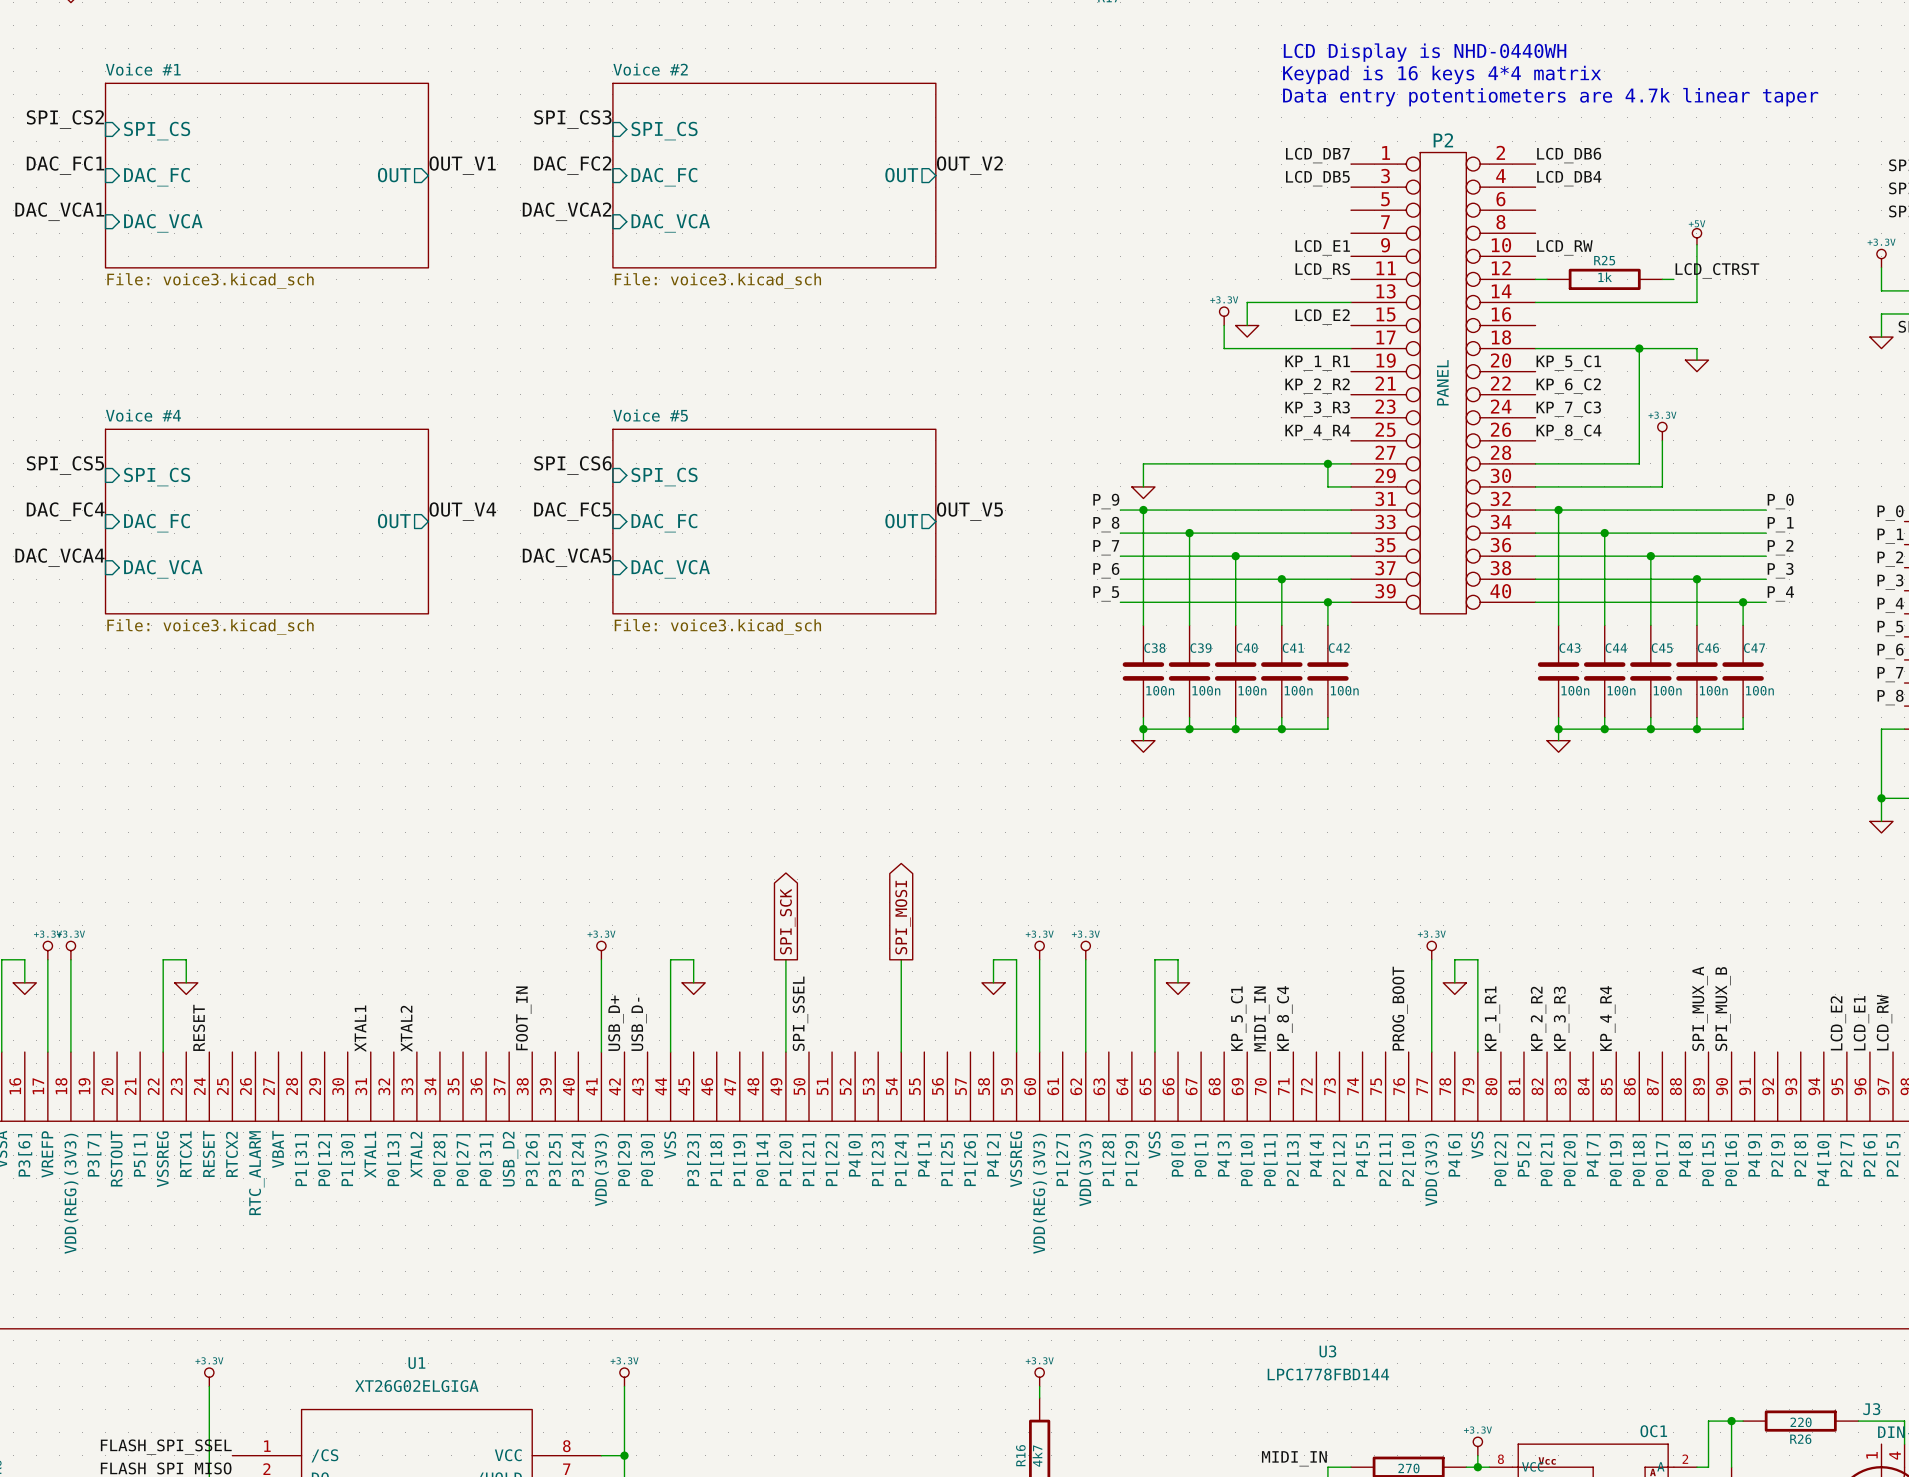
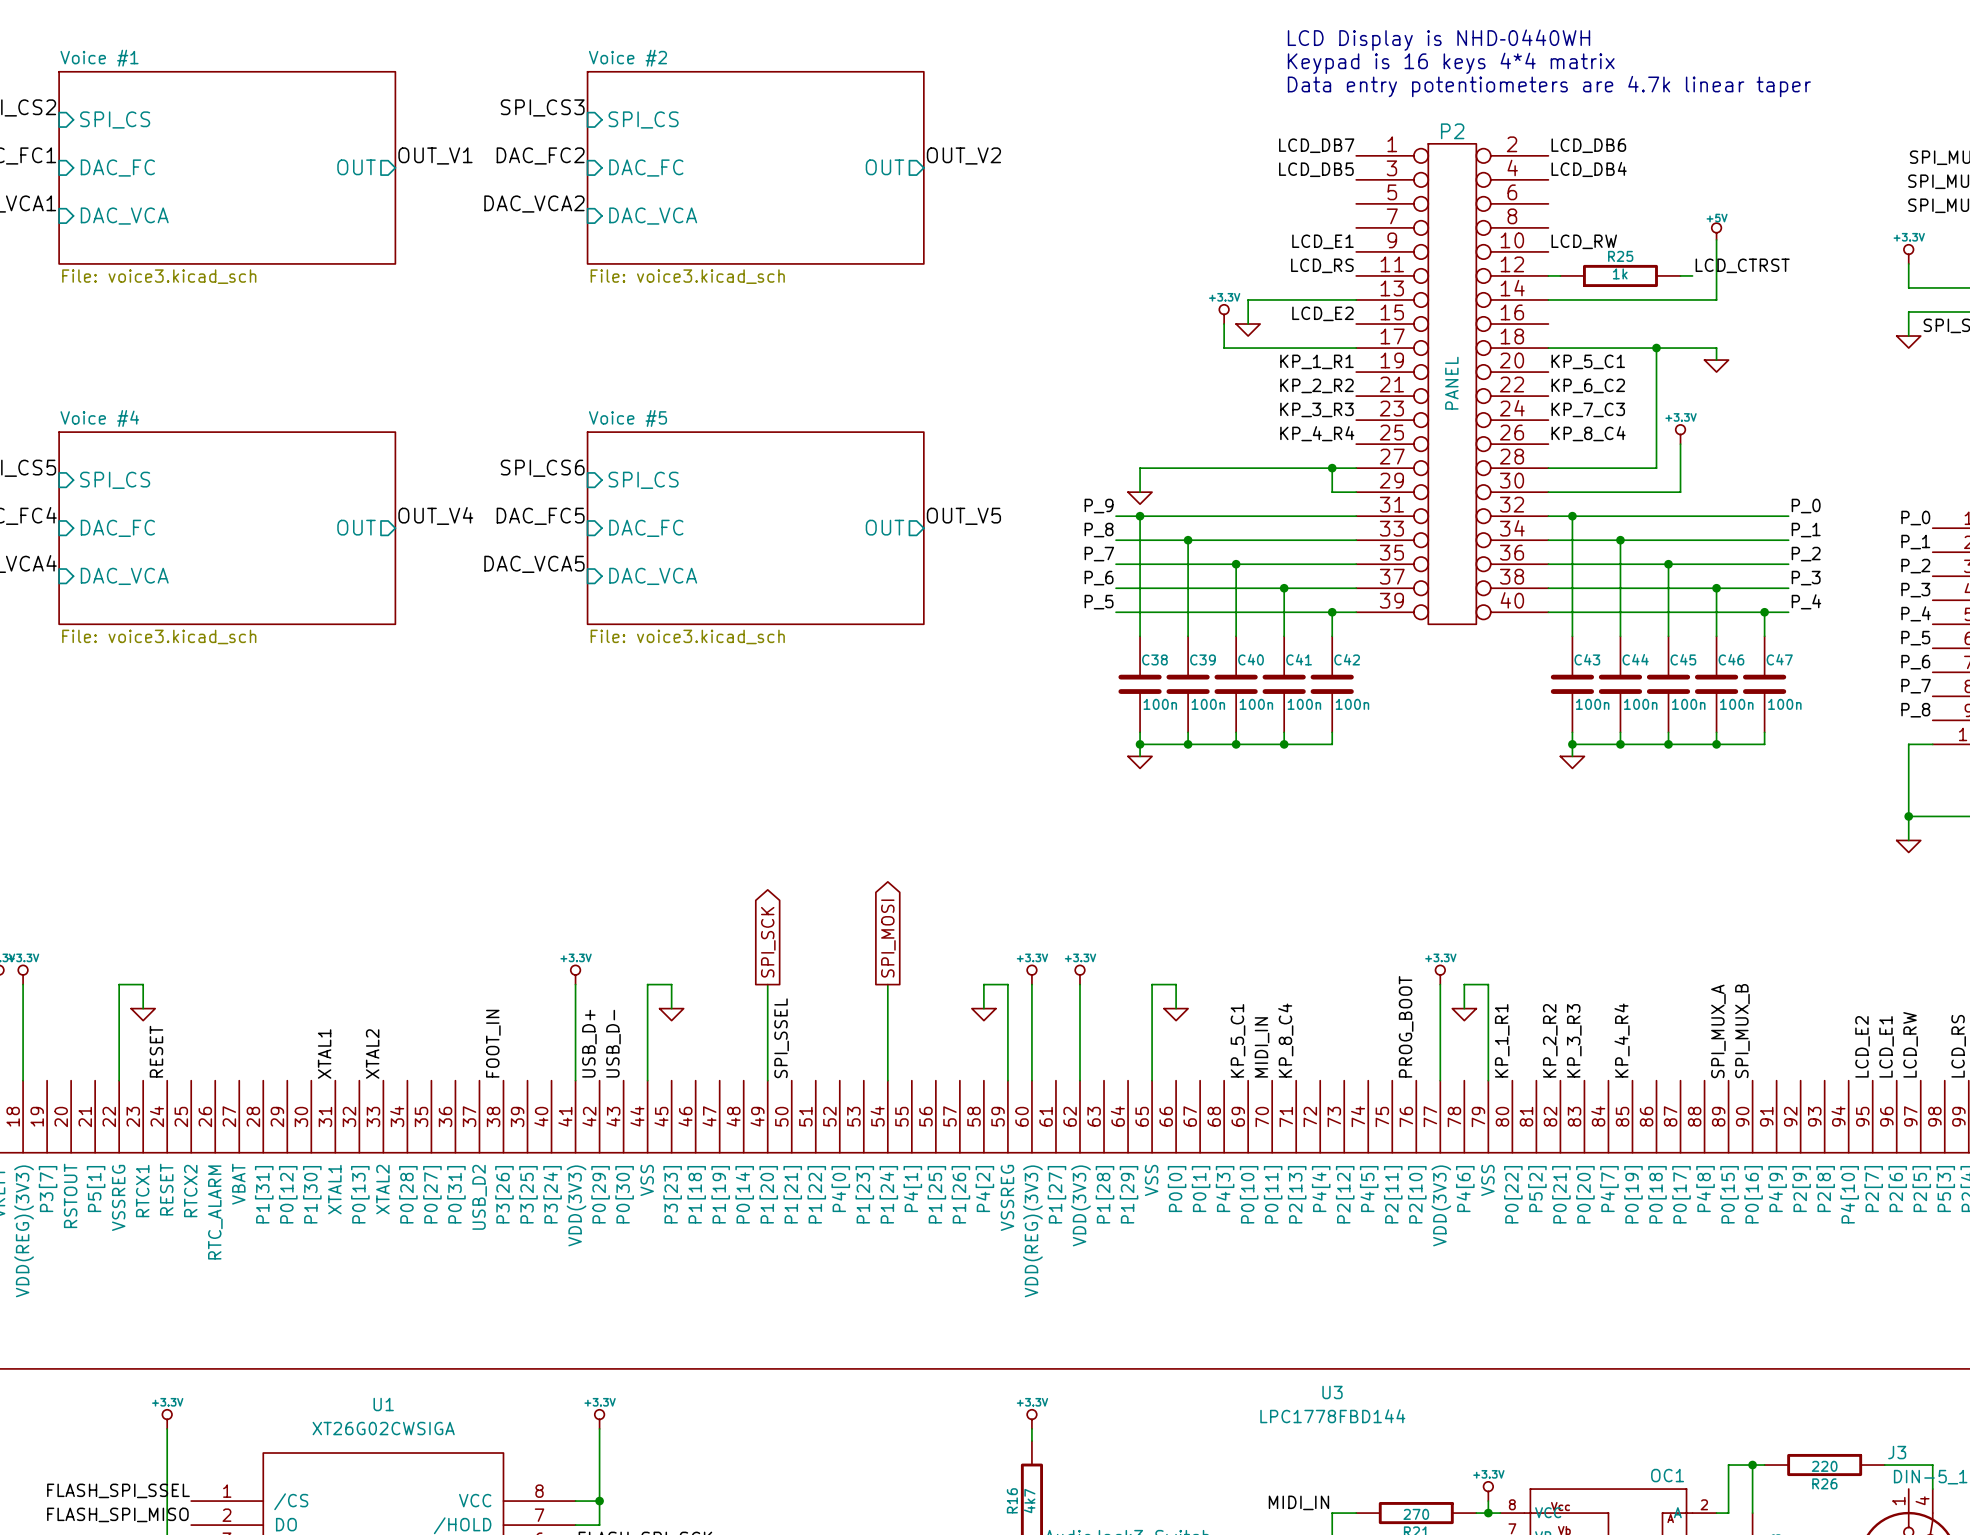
U1 value: XT26G02ELGIGA (416, 1386) -> XT26G02CWSIGA (383, 1428)

